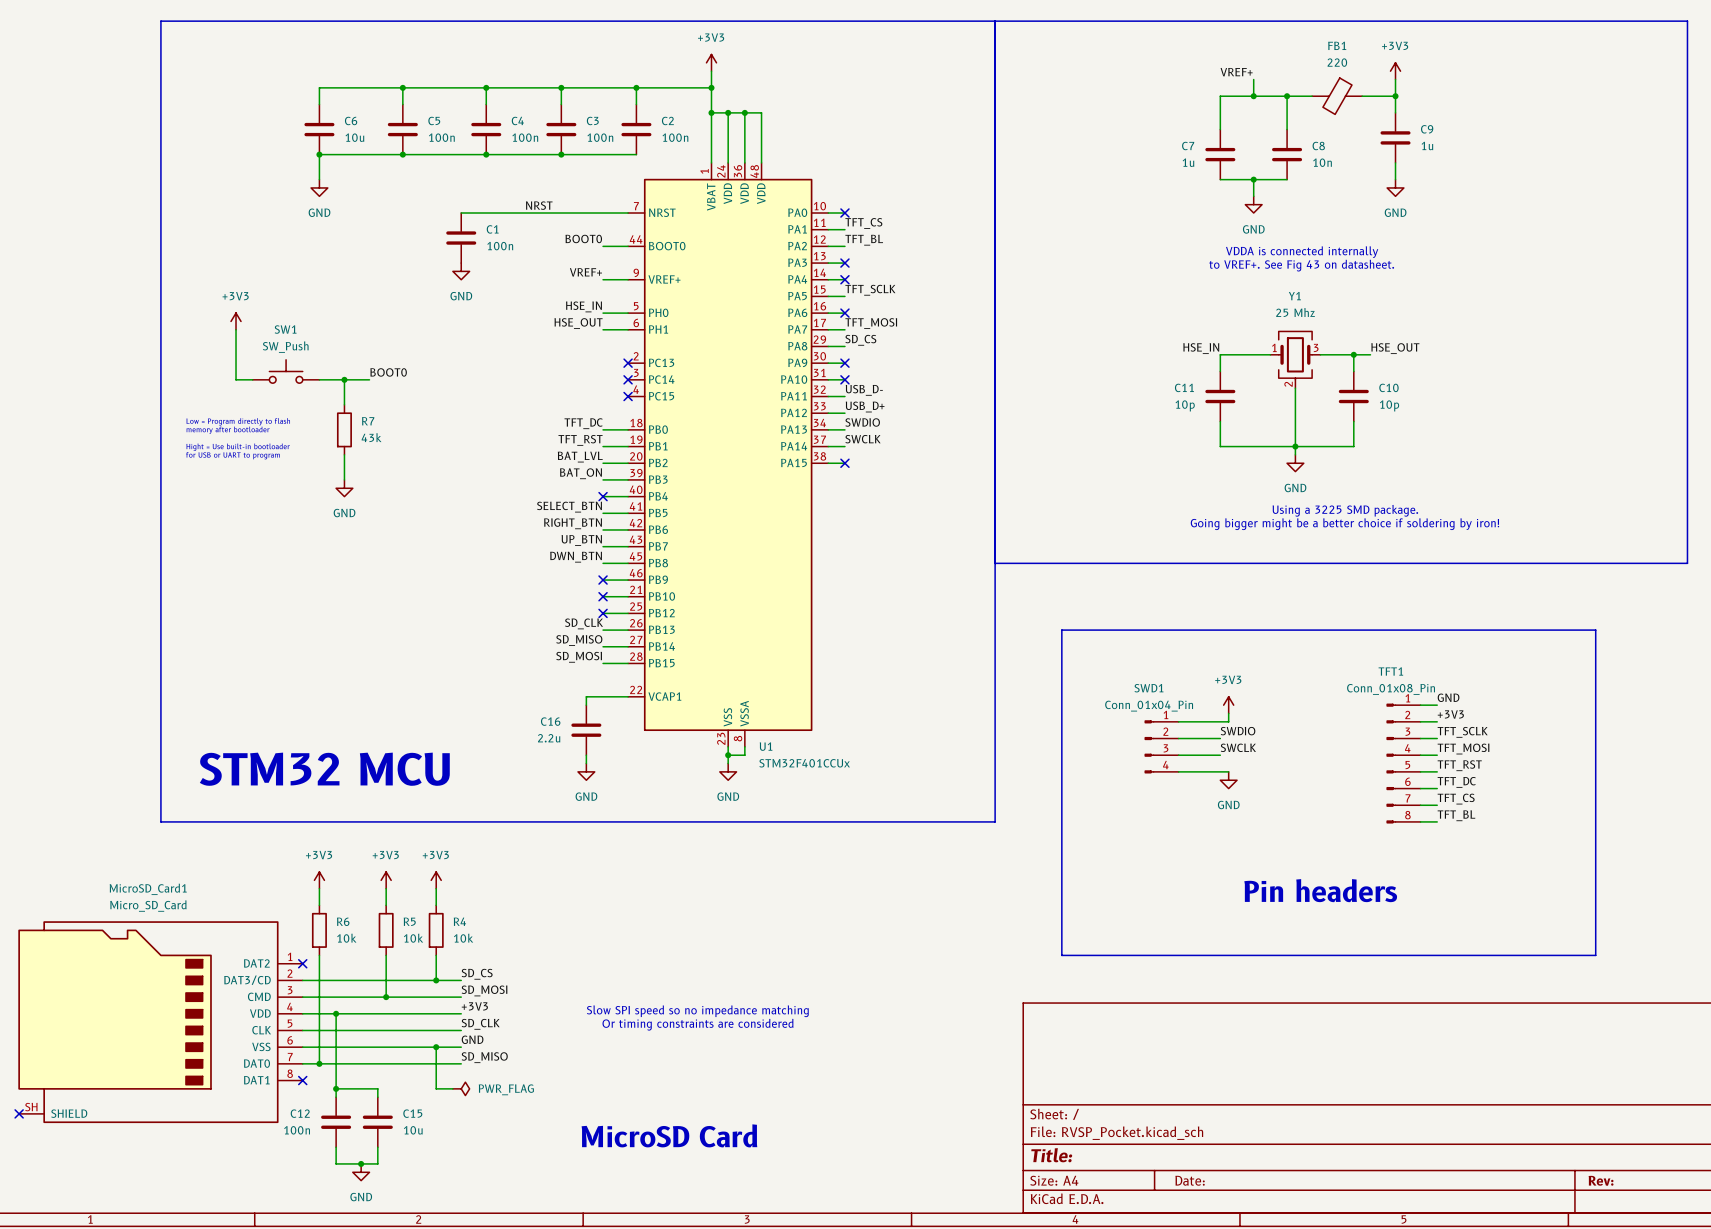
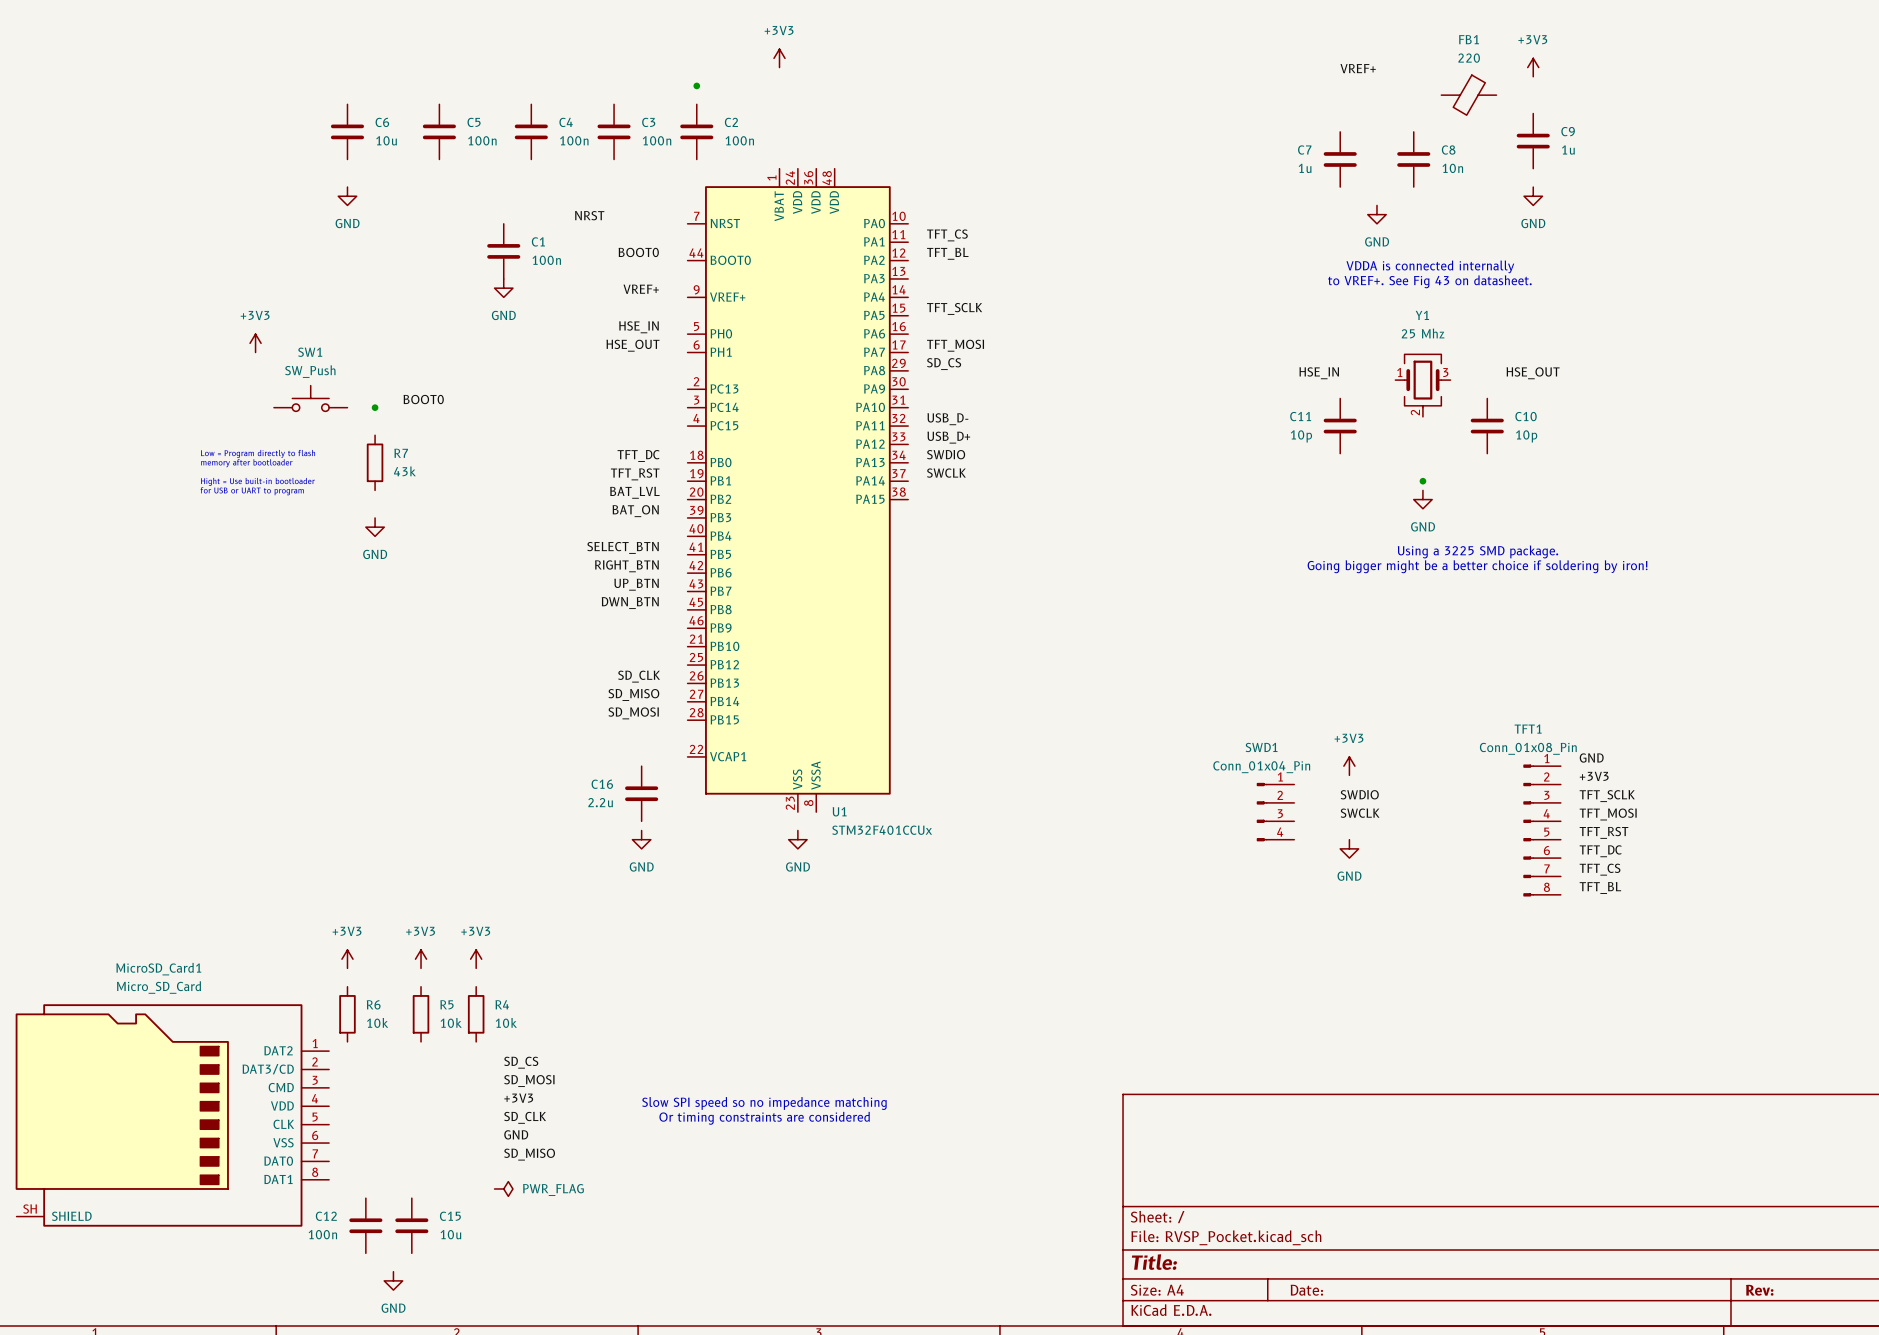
line: (995, 21) (995, 821) (160, 821) (160, 21) (1687, 21) (1687, 563) (995, 563) -> none
wire: (711, 71) (711, 162) -> none
wire: (1253, 79) (1253, 96) -> none
wire: (1395, 79) (1395, 112) -> none
wire: (402, 87) (402, 104) -> none
junction: (402, 87) -> none
wire: (486, 87) (486, 104) -> none
junction: (486, 87) -> none
wire: (561, 87) (561, 104) -> none
junction: (561, 87) -> none
wire: (636, 87) (636, 104) -> none
wire: (711, 87) (319, 87) (319, 104) -> none
junction: (711, 87) -> none
junction: (1253, 96) -> none
wire: (1287, 96) (1287, 129) -> none
junction: (1287, 96) -> none
wire: (1312, 96) (1220, 96) (1220, 129) -> none
wire: (1362, 96) (1395, 96) -> none
junction: (1395, 96) -> none
wire: (711, 112) (761, 112) (761, 162) -> none
junction: (711, 112) -> none
wire: (728, 112) (728, 162) -> none
junction: (728, 112) -> none
wire: (744, 112) (744, 162) -> none
junction: (744, 112) -> none
junction: (319, 154) -> none
junction: (402, 154) -> none
junction: (486, 154) -> none
junction: (561, 154) -> none
wire: (636, 154) (319, 154) (319, 179) -> none
wire: (1395, 162) (1395, 179) -> none
wire: (1220, 179) (1287, 179) -> none
wire: (1253, 179) (1253, 196) -> none
junction: (1253, 179) -> none
wire: (461, 213) (628, 213) -> none
wire: (828, 213) (844, 213) -> none
no-connect mark: (844, 213) -> none
wire: (828, 229) (844, 229) -> none
wire: (603, 246) (628, 246) -> none
wire: (828, 246) (844, 246) -> none
wire: (828, 263) (844, 263) -> none
no-connect mark: (844, 263) -> none
wire: (603, 279) (628, 279) -> none
wire: (828, 279) (844, 279) -> none
no-connect mark: (844, 279) -> none
wire: (828, 296) (844, 296) -> none
wire: (603, 313) (628, 313) -> none
wire: (828, 313) (844, 313) -> none
no-connect mark: (844, 313) -> none
wire: (236, 329) (236, 379) (252, 379) -> none
wire: (603, 329) (628, 329) -> none
wire: (828, 329) (844, 329) -> none
wire: (828, 346) (844, 346) -> none
wire: (1270, 354) (1220, 354) (1220, 371) -> none
wire: (1320, 354) (1370, 354) -> none
wire: (1353, 354) (1353, 371) -> none
junction: (1353, 354) -> none
no-connect mark: (628, 363) -> none
wire: (828, 363) (844, 363) -> none
no-connect mark: (844, 363) -> none
wire: (319, 379) (369, 379) -> none
wire: (344, 379) (344, 404) -> none
no-connect mark: (628, 379) -> none
wire: (828, 379) (844, 379) -> none
no-connect mark: (844, 379) -> none
wire: (1295, 388) (1295, 454) -> none
no-connect mark: (628, 396) -> none
wire: (828, 396) (844, 396) -> none
wire: (828, 413) (844, 413) -> none
wire: (1220, 421) (1220, 446) (1353, 446) (1353, 421) -> none
wire: (603, 429) (628, 429) -> none
wire: (828, 429) (844, 429) -> none
wire: (603, 446) (628, 446) -> none
wire: (828, 446) (844, 446) -> none
wire: (344, 454) (344, 479) -> none
wire: (603, 463) (628, 463) -> none
wire: (828, 463) (844, 463) -> none
no-connect mark: (844, 463) -> none
wire: (603, 479) (628, 479) -> none
wire: (603, 496) (628, 496) -> none
no-connect mark: (603, 496) -> none
wire: (603, 513) (628, 513) -> none
wire: (603, 529) (628, 529) -> none
wire: (603, 546) (628, 546) -> none
wire: (603, 563) (628, 563) -> none
wire: (603, 580) (628, 580) -> none
no-connect mark: (603, 580) -> none
wire: (603, 596) (628, 596) -> none
no-connect mark: (603, 596) -> none
wire: (603, 613) (628, 613) -> none
no-connect mark: (603, 613) -> none
wire: (603, 630) (628, 630) -> none
line: (1061, 630) (1595, 630) (1595, 955) (1061, 955) (1061, 630) -> none
wire: (603, 646) (628, 646) -> none
wire: (603, 663) (628, 663) -> none
wire: (628, 696) (586, 696) (586, 705) -> none
wire: (1420, 705) (1437, 705) -> none
wire: (1228, 713) (1228, 721) (1178, 721) -> none
wire: (1420, 721) (1437, 721) -> none
wire: (1178, 738) (1220, 738) -> none
wire: (1420, 738) (1437, 738) -> none
wire: (728, 746) (728, 763) -> none
wire: (744, 746) (744, 755) (728, 755) -> none
wire: (586, 755) (586, 763) -> none
junction: (728, 755) -> none
wire: (1178, 755) (1220, 755) -> none
wire: (1420, 755) (1437, 755) -> none
text: STM32 MCU (324, 769) -> none
wire: (1178, 771) (1228, 771) -> none
wire: (1420, 771) (1437, 771) -> none
wire: (1420, 788) (1437, 788) -> none
wire: (1420, 805) (1437, 805) -> none
wire: (1420, 821) (1437, 821) -> none
wire: (319, 888) (319, 905) -> none
wire: (386, 888) (386, 905) -> none
wire: (436, 888) (436, 905) -> none
text: Pin headers (1320, 890) -> none
wire: (319, 955) (319, 1063) -> none
wire: (386, 955) (386, 997) -> none
wire: (436, 955) (436, 980) -> none
no-connect mark: (302, 963) -> none
wire: (302, 980) (461, 980) -> none
junction: (436, 980) -> none
wire: (302, 997) (461, 997) -> none
junction: (386, 997) -> none
wire: (302, 1013) (461, 1013) -> none
wire: (336, 1013) (336, 1097) -> none
junction: (336, 1013) -> none
wire: (302, 1030) (461, 1030) -> none
wire: (302, 1047) (461, 1047) -> none
wire: (436, 1047) (436, 1088) (452, 1088) -> none
junction: (436, 1047) -> none
wire: (302, 1063) (461, 1063) -> none
junction: (319, 1063) -> none
no-connect mark: (302, 1080) -> none
wire: (336, 1088) (377, 1088) (377, 1097) -> none
junction: (336, 1088) -> none
no-connect mark: (19, 1113) -> none
text: MicroSD Card (669, 1135) -> none
wire: (336, 1147) (336, 1163) (377, 1163) (377, 1147) -> none
junction: (361, 1163) -> none

